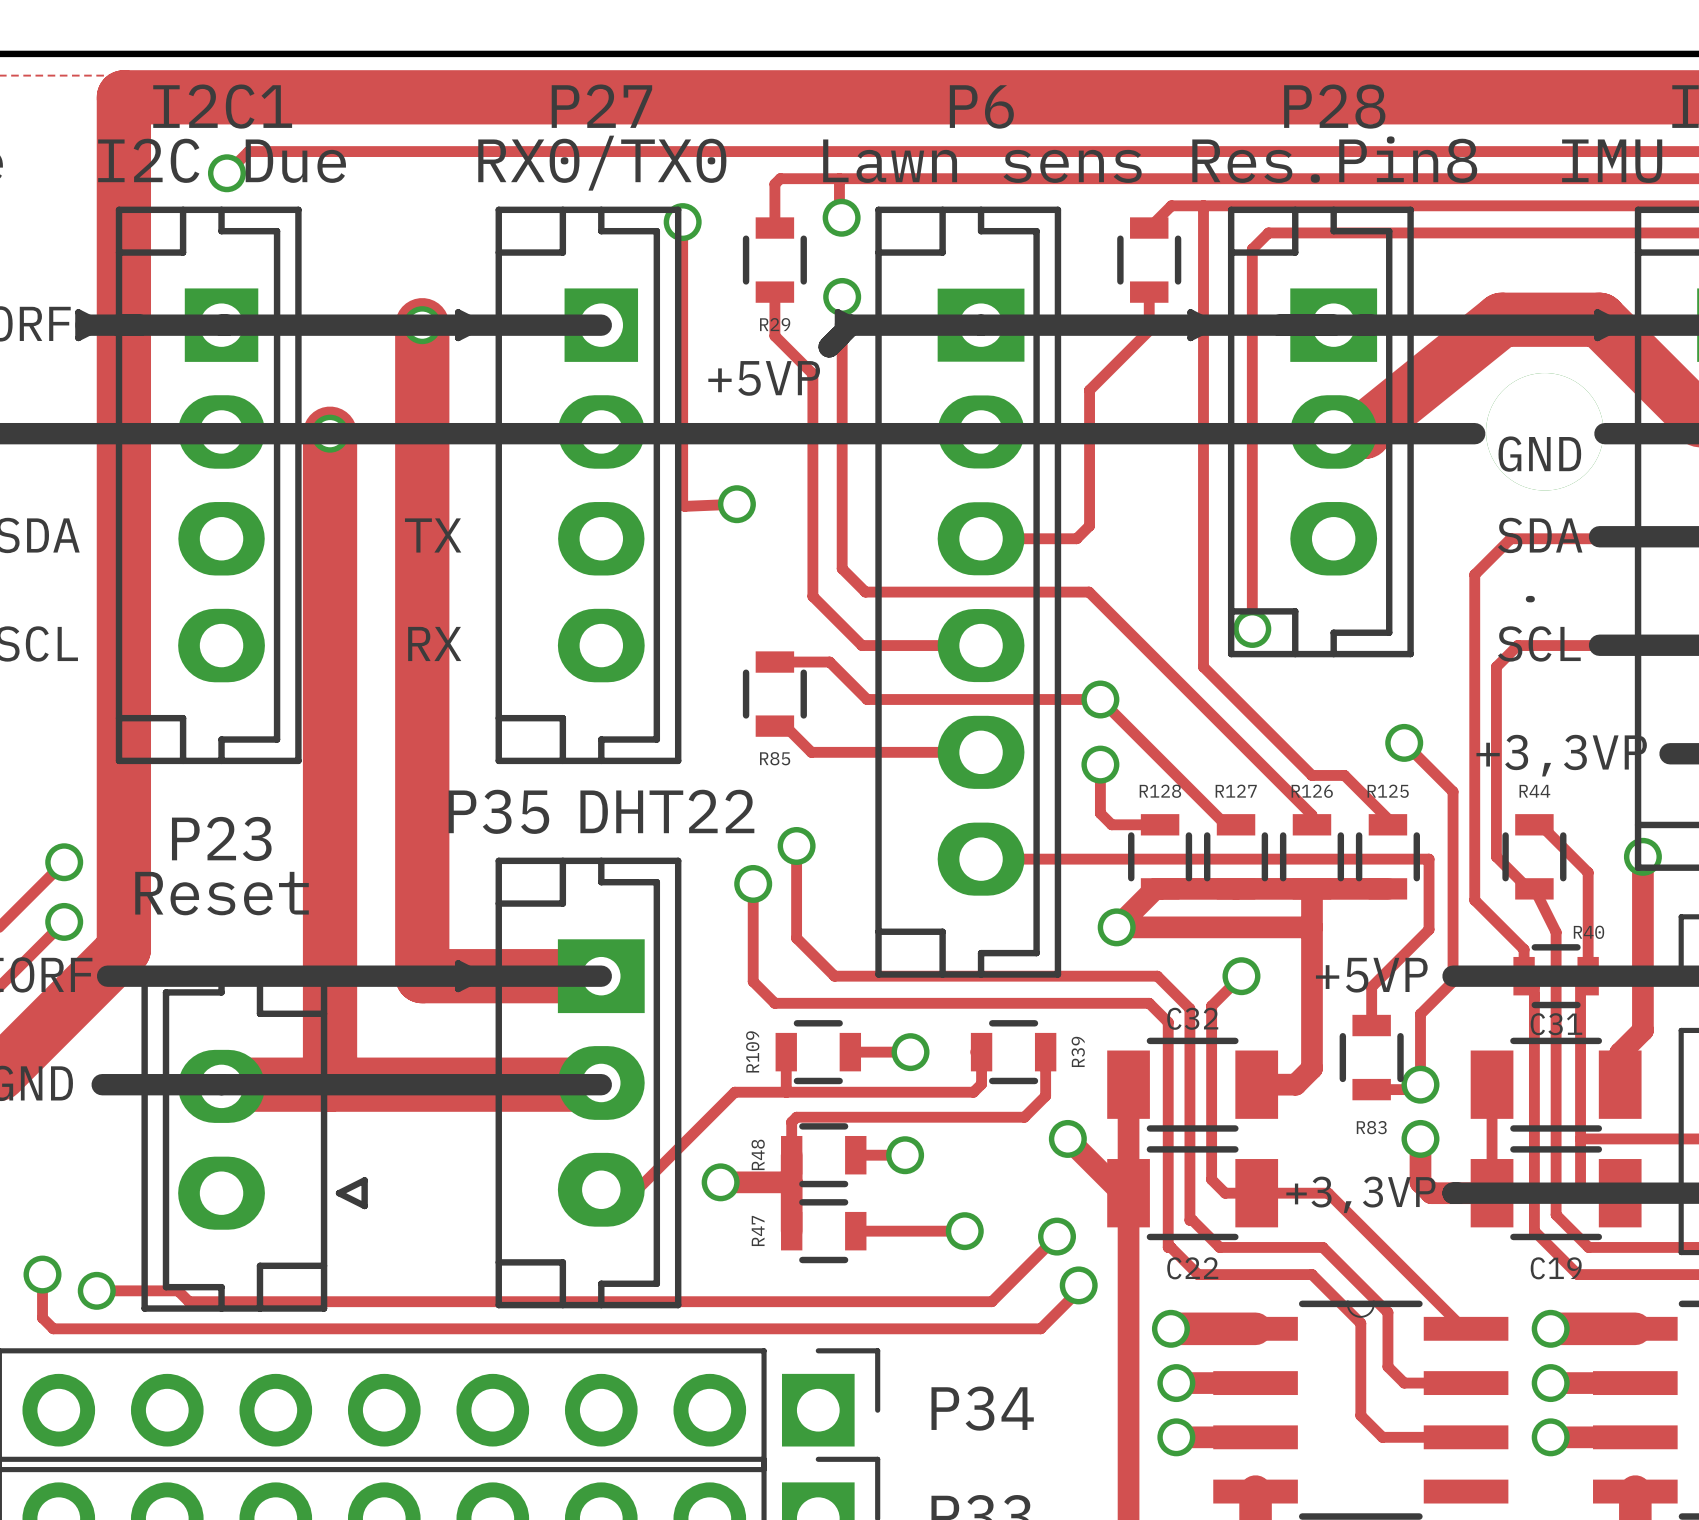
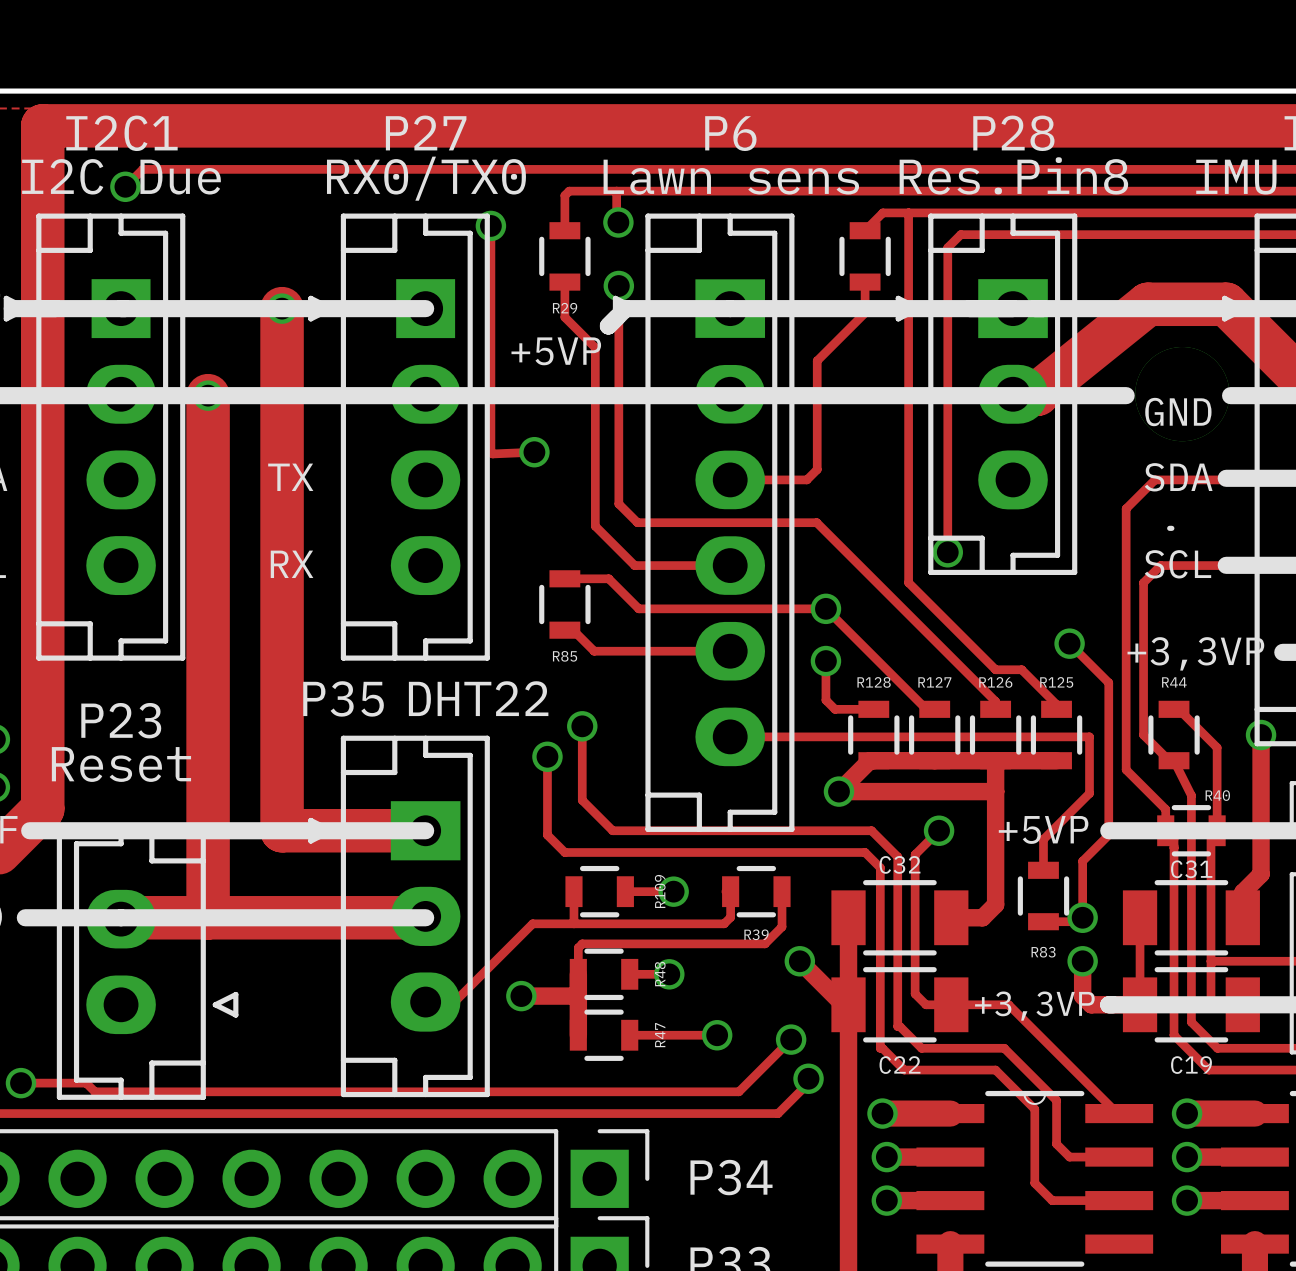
R109 name position: R109 (752, 1051) -> R109 (660, 891)
R39 name rotation: 0° (1078, 1051) -> 90° clockwise (756, 934)
R39 name position: R39 (1078, 1051) -> R39 (756, 934)
R48 name position: R48 (758, 1154) -> R48 (660, 974)
R47 name position: R47 (758, 1230) -> R47 (660, 1035)

